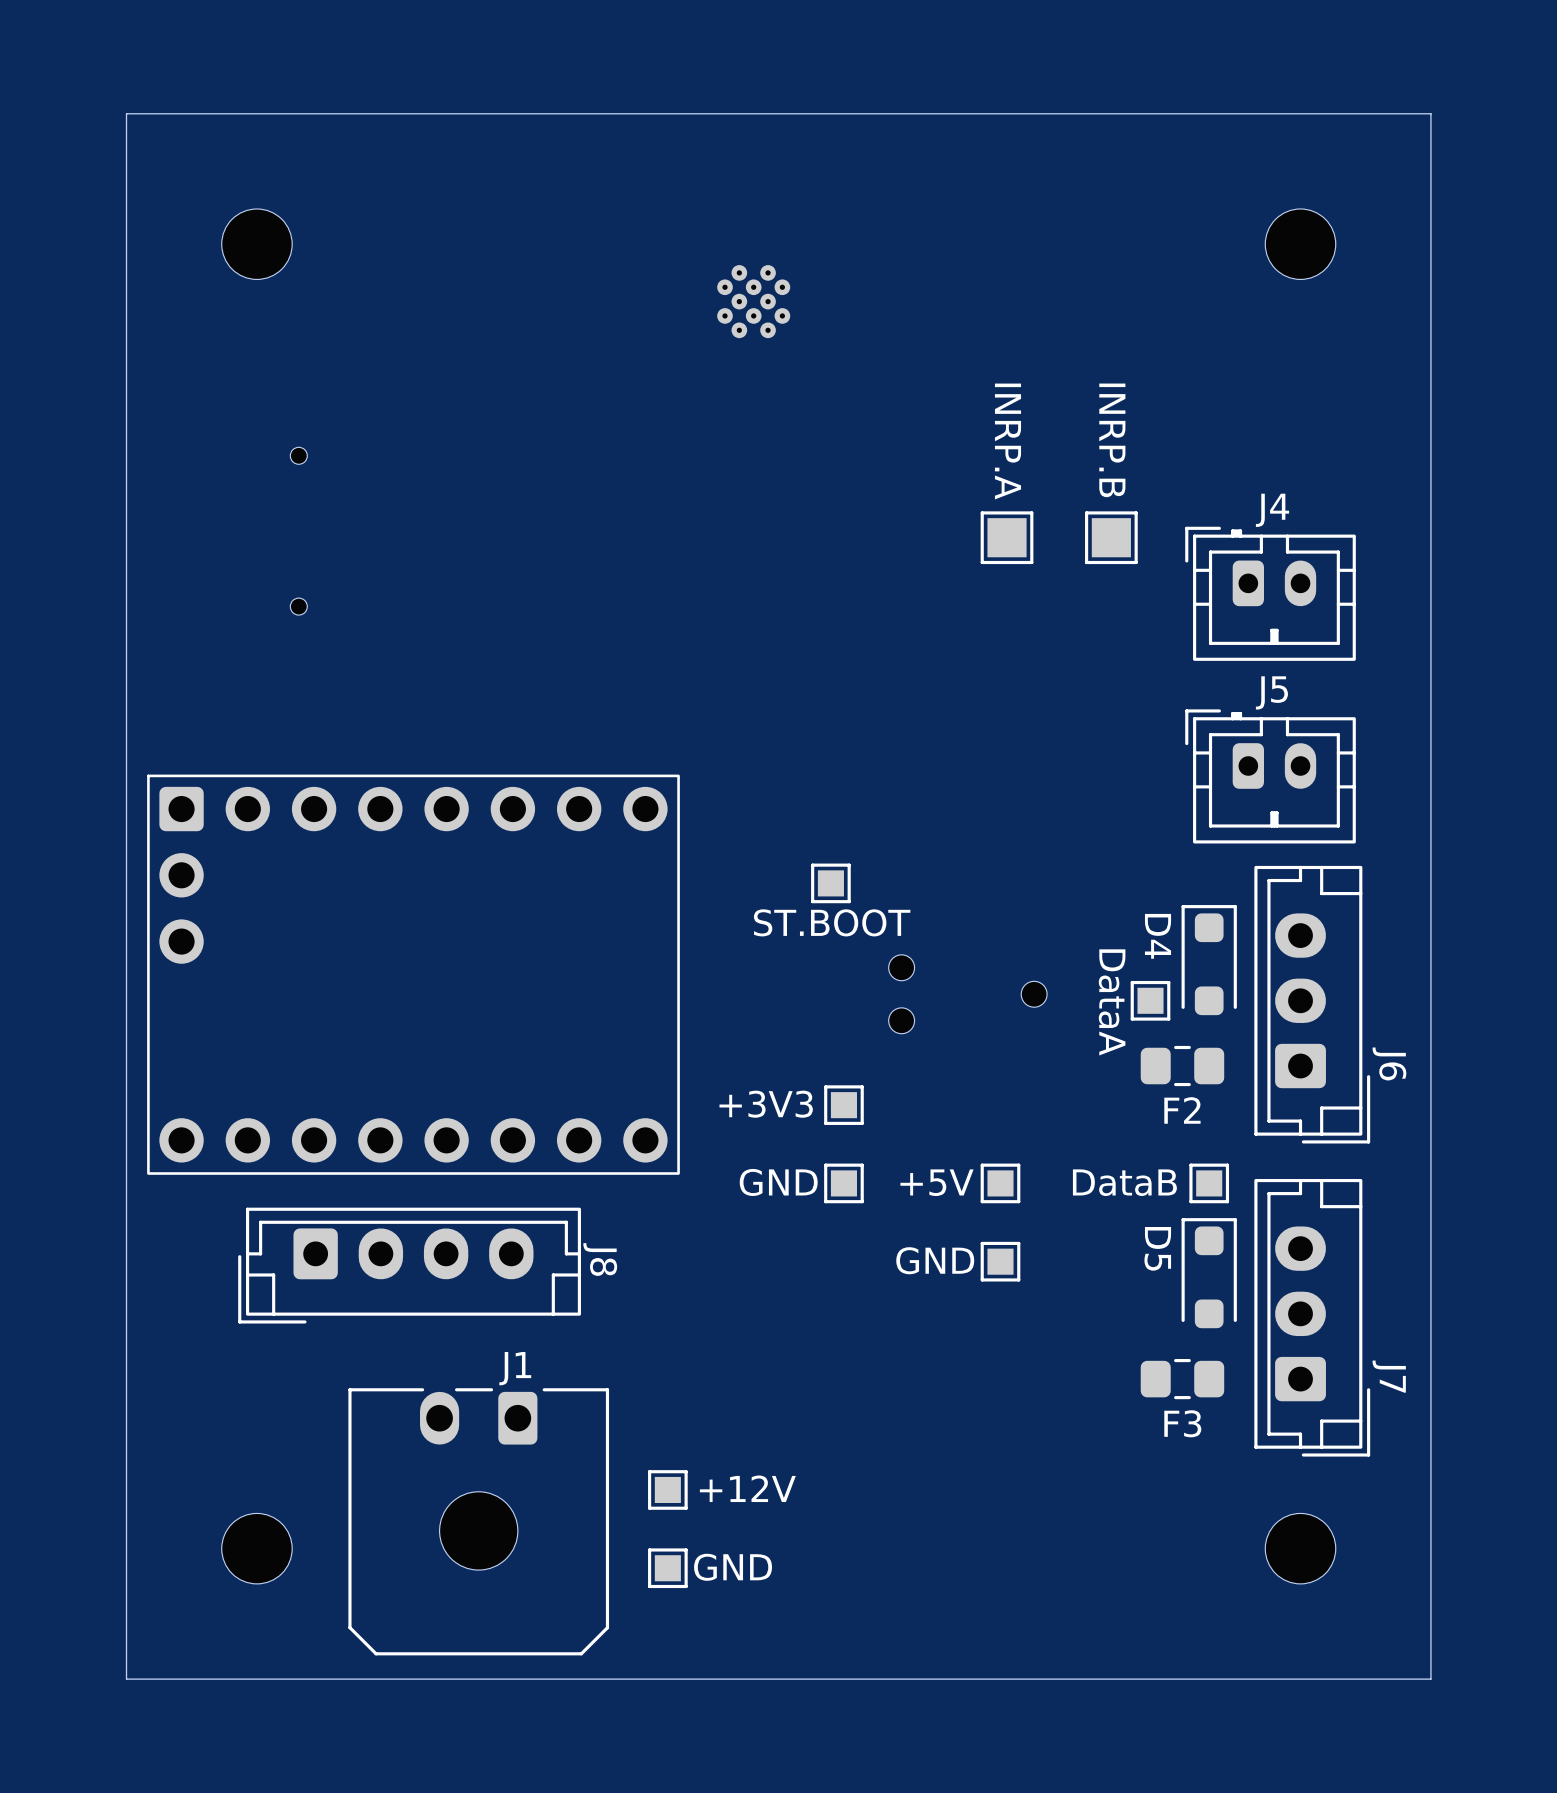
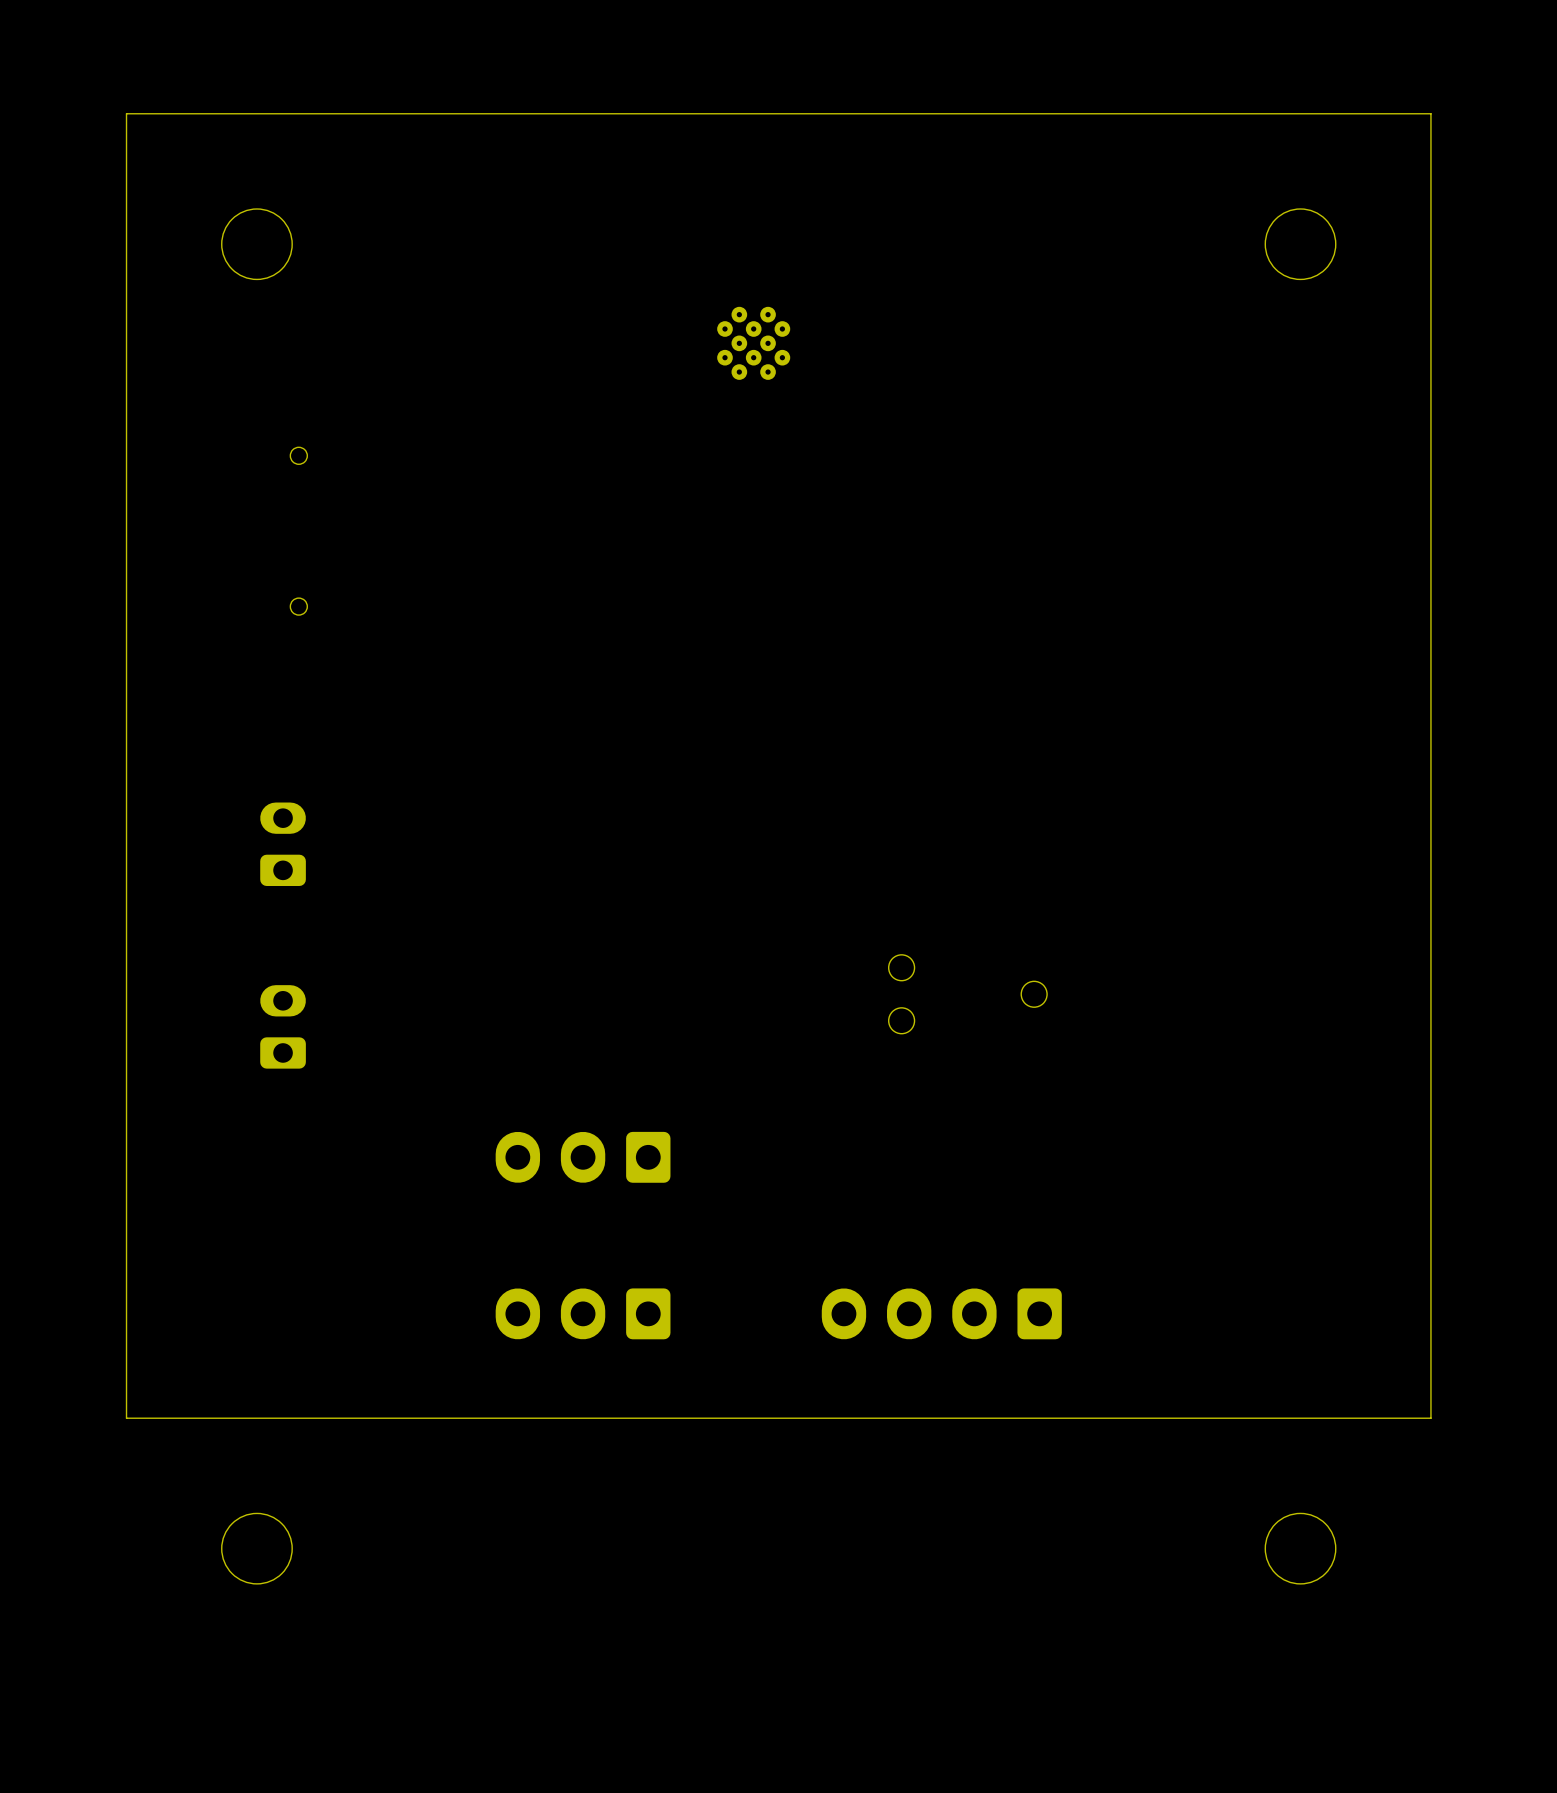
part position: (753, 301) -> (753, 343)
part: INRP.A (1007, 537) -> none
part: INRP.B (1111, 537) -> none
J4: (1270, 593) -> none
J5: (1270, 776) -> none
part: none -> (283, 844)
part: ST.BOOT (830, 883) -> none
D4: (1209, 960) -> none
part: (413, 974) -> none
part: DataA (1150, 1000) -> none
J6: (1312, 1004) -> none
part: none -> (283, 1026)
F2: (1182, 1066) -> none
part: +3V3 (843, 1105) -> none
part: none -> (583, 1157)
part: GND (843, 1183) -> none
part: +5V (1000, 1183) -> none
part: DataB (1209, 1183) -> none
part: GND (1000, 1261) -> none
J8 side: bottom (409, 1265) -> top (941, 1313)
D5: (1209, 1273) -> none
part: none -> (583, 1313)
J7: (1312, 1317) -> none
F3: (1182, 1379) -> none
board edge: (1430, 1418) (1430, 1679) (126, 1679) (126, 1418) -> (1430, 1418) (126, 1418)
part: +12V (667, 1489) -> none
J1: (478, 1521) -> none
part: GND (667, 1568) -> none

